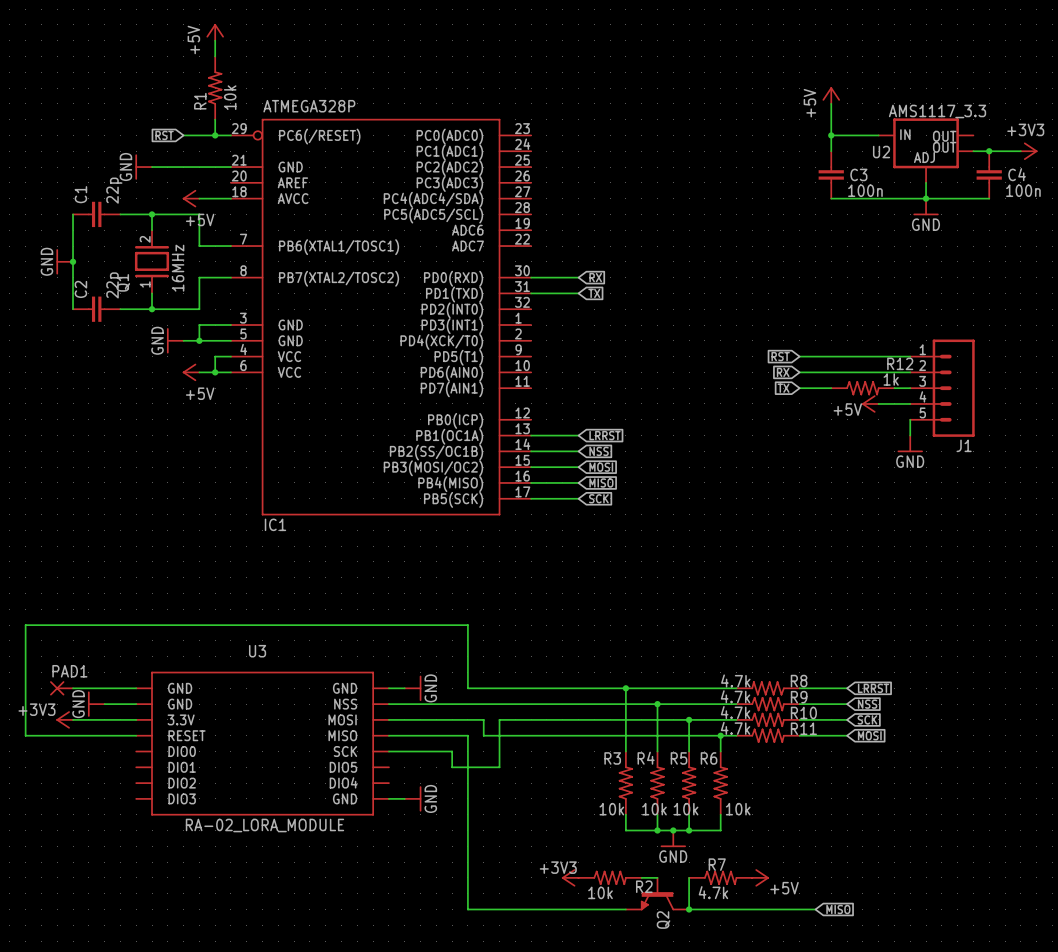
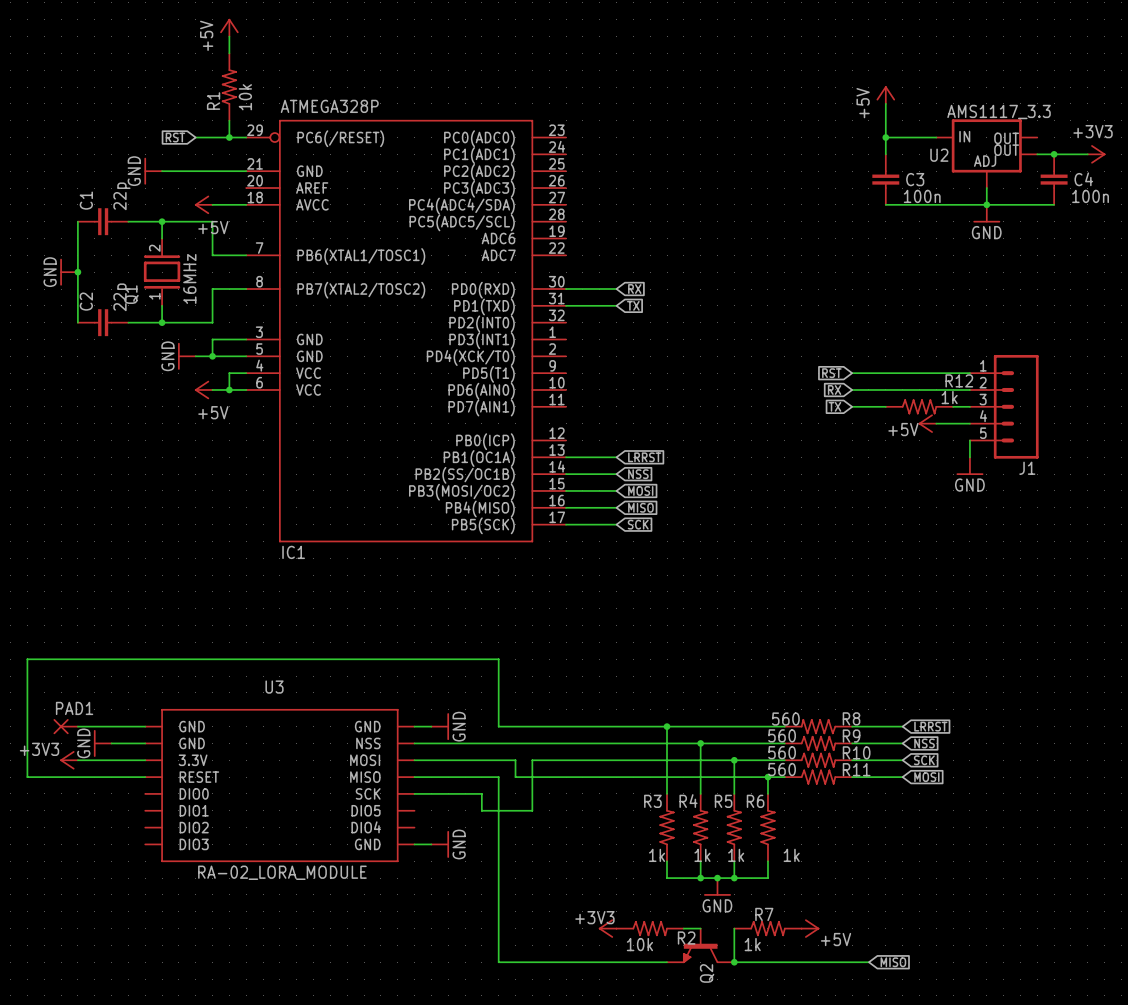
R8 value: 4.7k (735, 680) -> 560 (785, 719)
R9 value: 4.7k (735, 696) -> 560 (782, 735)
R10 value: 4.7k (735, 712) -> 560 (782, 752)
R11 value: 4.7k (735, 728) -> 560 (782, 769)
R3 value: 10k (611, 809) -> 1k (657, 855)
R4 value: 10k (654, 809) -> 1k (702, 855)
R5 value: 10k (686, 809) -> 1k (736, 855)
R6 value: 10k (738, 809) -> 1k (791, 855)
R7 value: 4.7k (713, 892) -> 1k (752, 944)

